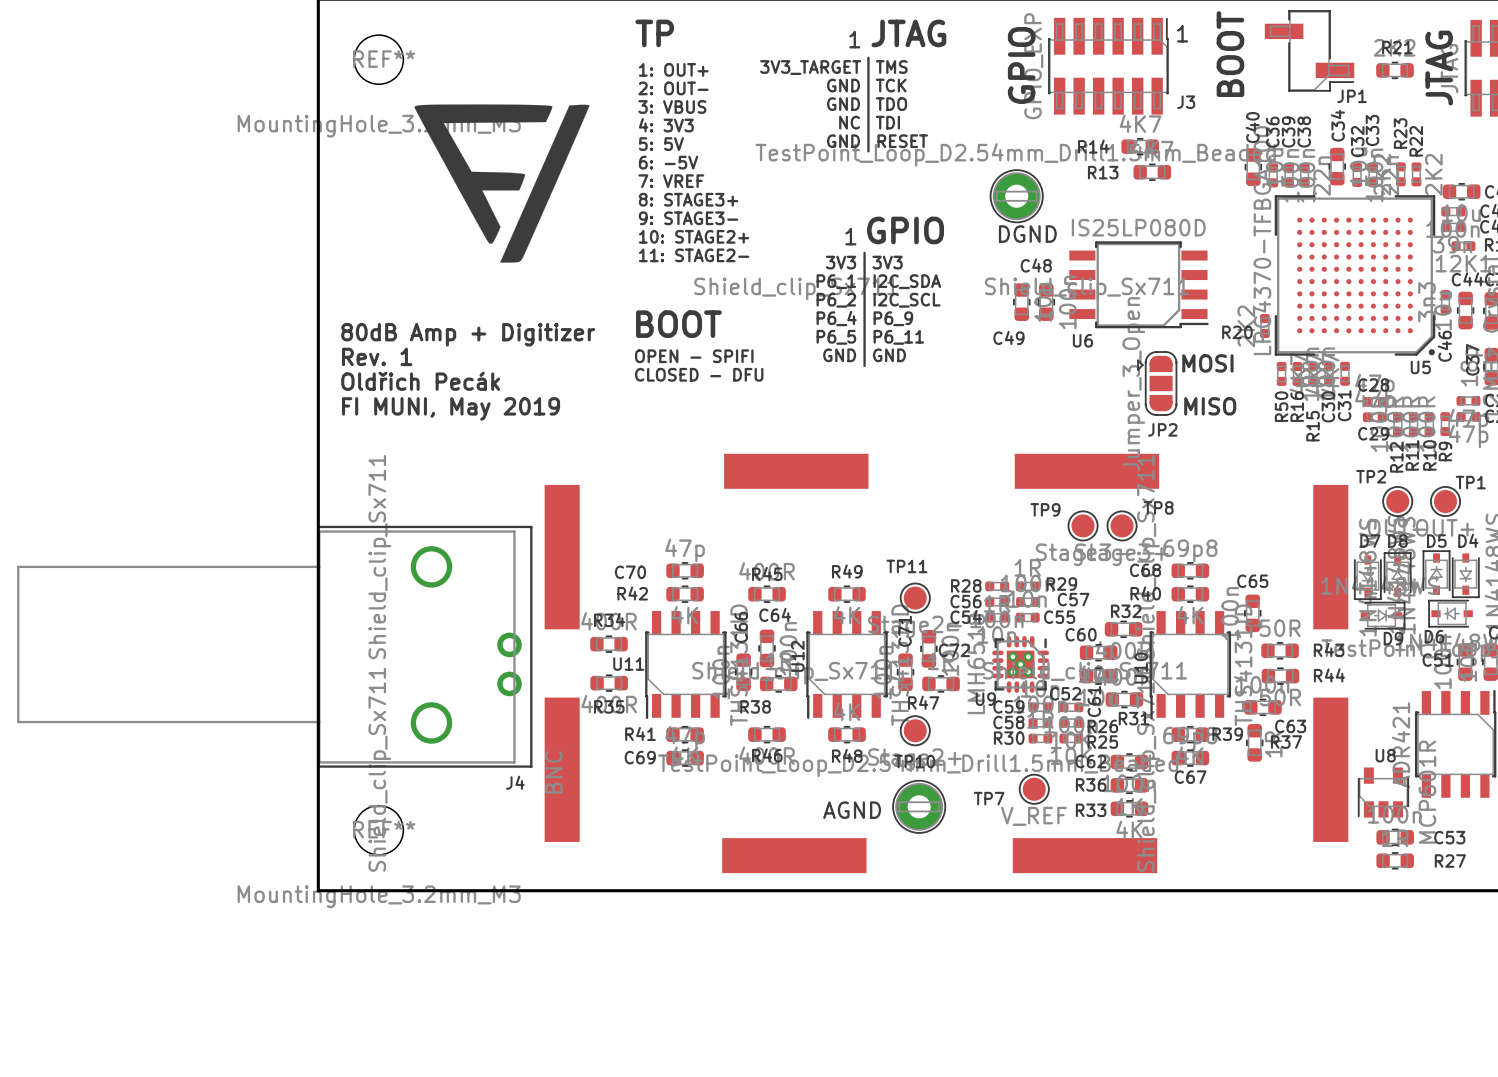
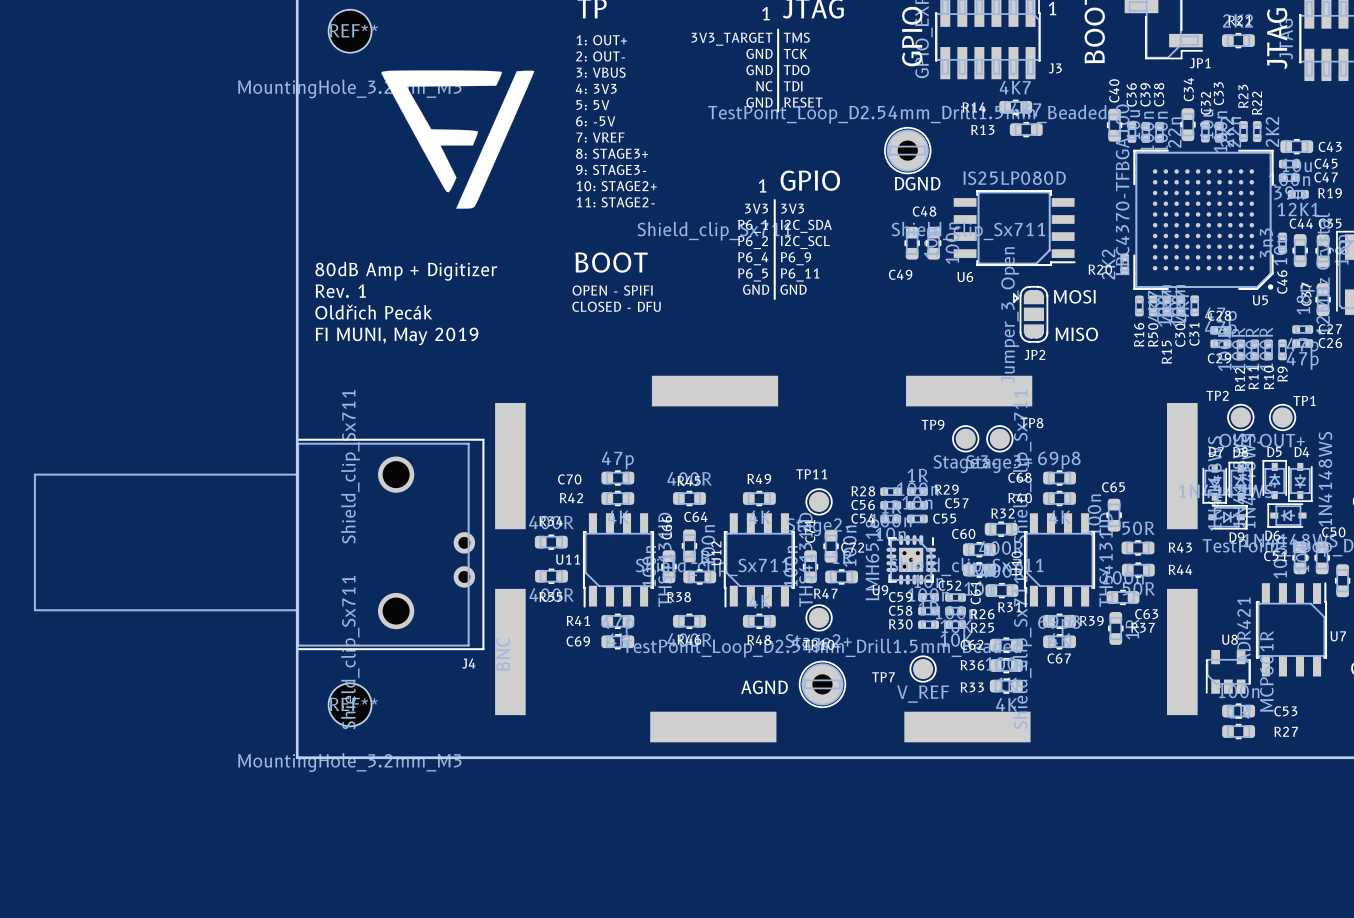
R50 name: R50 (1281, 406) -> R16 (1139, 334)
R16 name: R16 (1297, 406) -> R50 (1153, 334)

